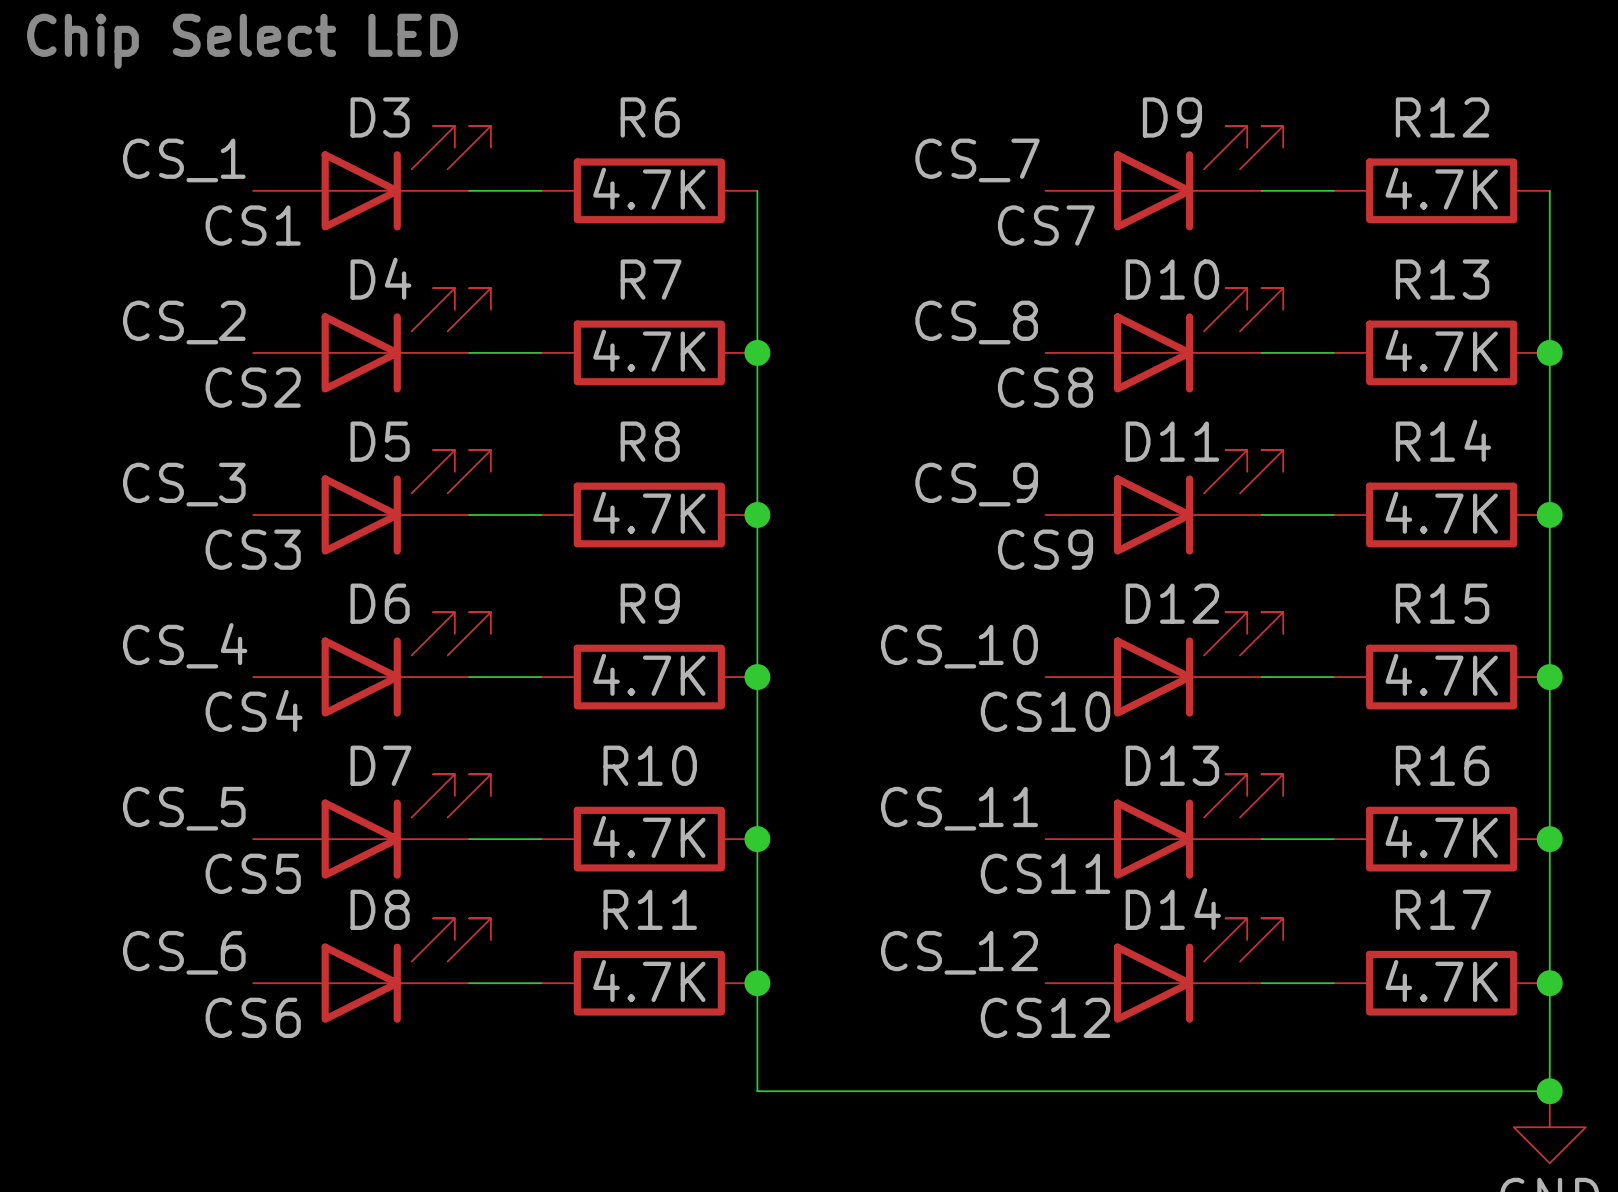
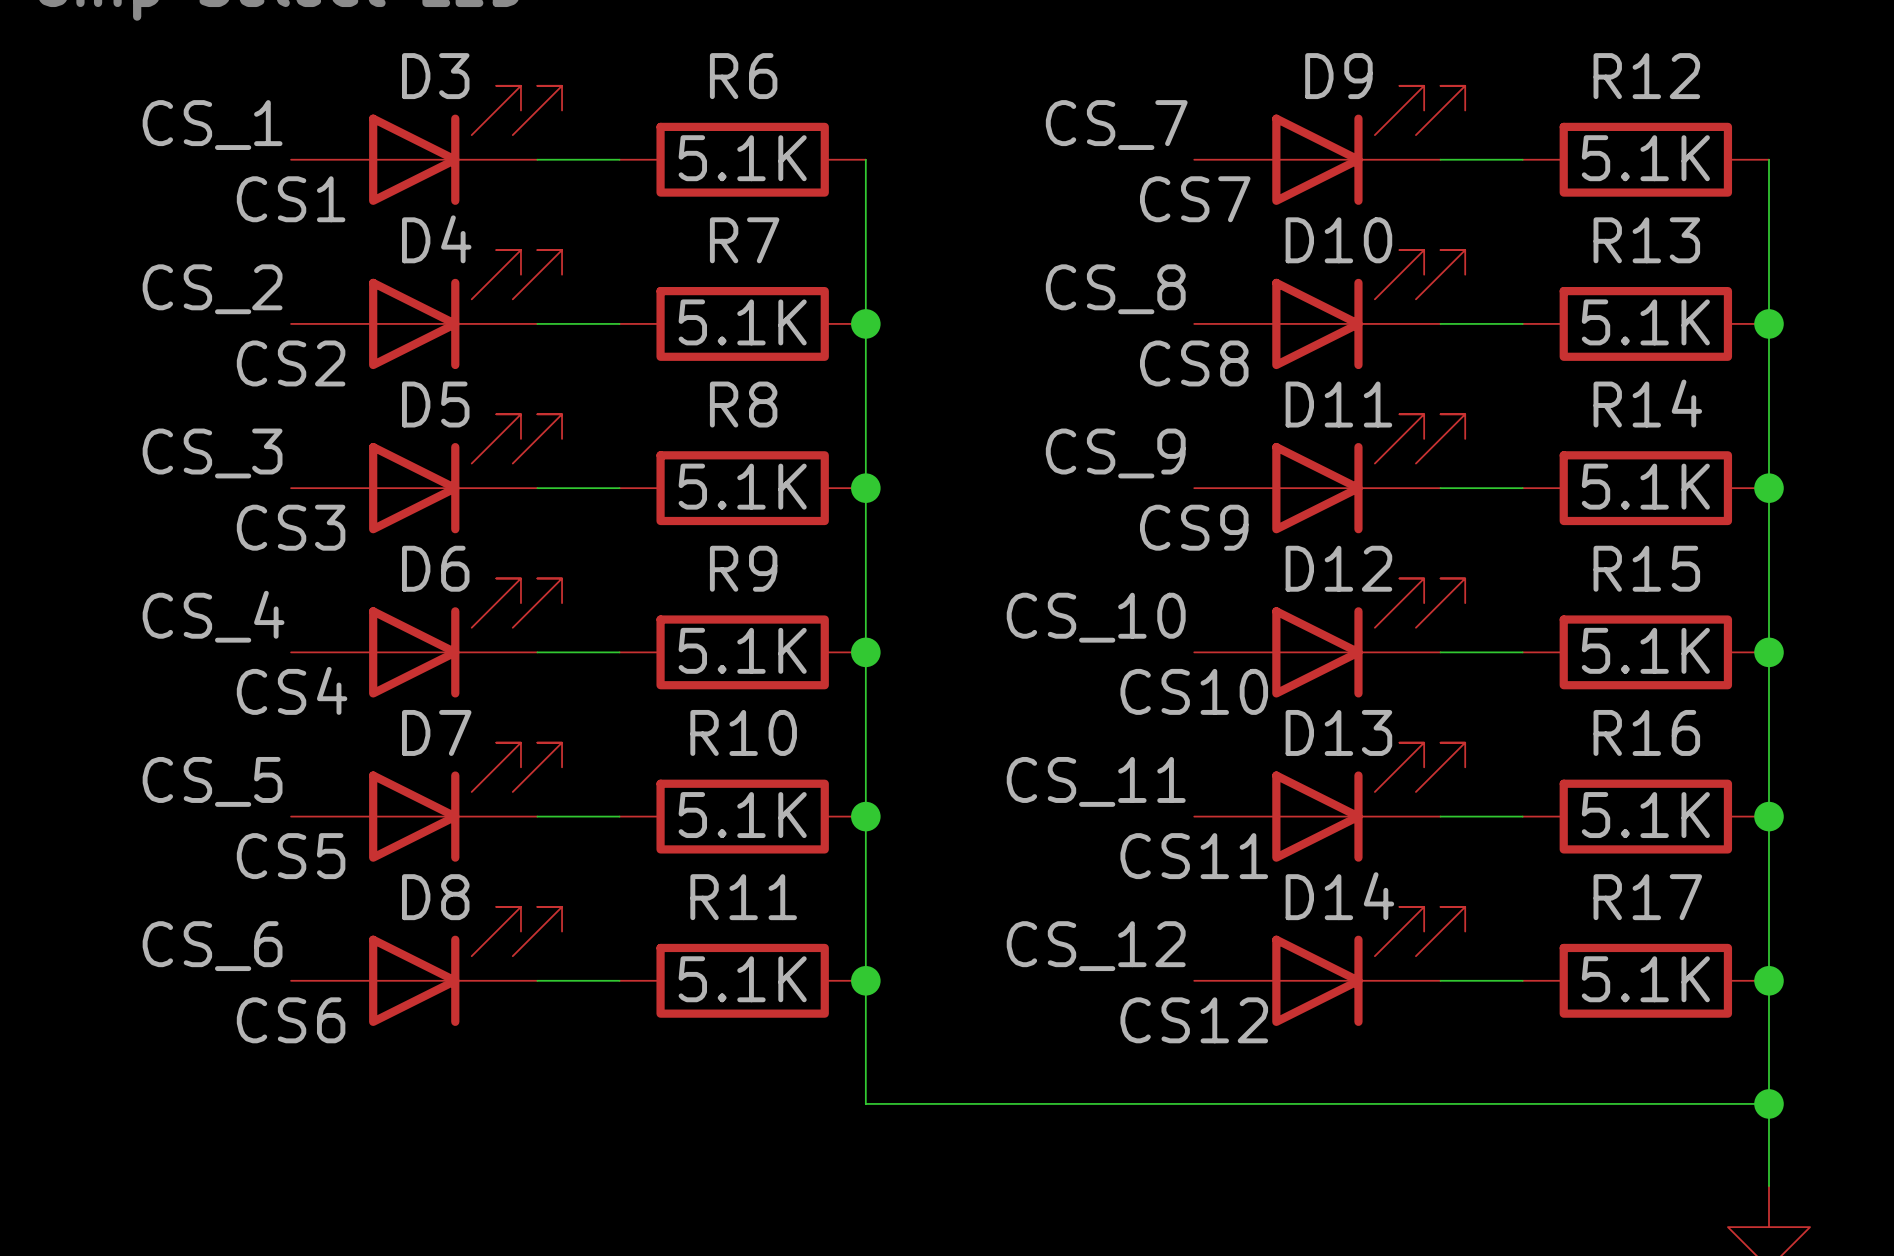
R6 value: 4.7K (649, 188) -> 5.1K (742, 158)
R12 value: 4.7K (1441, 188) -> 5.1K (1645, 158)
label position: CS_2 (184, 322) -> CS_2 (212, 289)
label position: CS_8 (976, 322) -> CS_8 (1115, 289)
D4 position: (372, 340) -> (426, 309)
D10 position: (1164, 340) -> (1329, 309)
R7 value: 4.7K (649, 350) -> 5.1K (742, 322)
R13 value: 4.7K (1441, 350) -> 5.1K (1645, 322)
wire: (469, 352) (541, 352) -> (537, 323) (619, 323)
R7 position: (649, 352) -> (742, 323)
junction position: (757, 352) -> (865, 323)
wire: (1261, 352) (1333, 352) -> (1440, 323) (1522, 323)
R13 position: (1441, 352) -> (1645, 323)
junction position: (1549, 352) -> (1769, 323)
label position: CS_3 (184, 484) -> CS_3 (212, 453)
label position: CS_9 (976, 484) -> CS_9 (1115, 453)
D5 position: (372, 502) -> (426, 473)
D11 position: (1164, 502) -> (1329, 473)
R8 value: 4.7K (649, 512) -> 5.1K (742, 486)
R14 value: 4.7K (1441, 512) -> 5.1K (1645, 486)
wire: (469, 514) (541, 514) -> (537, 488) (619, 488)
R8 position: (649, 514) -> (742, 488)
junction position: (757, 514) -> (865, 488)
wire: (1261, 514) (1333, 514) -> (1440, 488) (1522, 488)
R14 position: (1441, 514) -> (1645, 488)
junction position: (1549, 514) -> (1769, 488)
junction: none -> (865, 652)
junction: none -> (1769, 652)
label position: CS_4 (185, 645) -> CS_4 (213, 616)
label position: CS_10 (959, 646) -> CS_10 (1096, 617)
D6 position: (372, 664) -> (426, 638)
D12 position: (1164, 664) -> (1329, 638)
R9 value: 4.7K (649, 674) -> 5.1K (742, 650)
R15 value: 4.7K (1441, 674) -> 5.1K (1645, 650)
wire: (469, 677) (541, 677) -> (537, 652) (619, 652)
R9 position: (649, 677) -> (742, 652)
junction: (757, 677) -> none
wire: (1261, 677) (1333, 677) -> (1440, 652) (1522, 652)
R15 position: (1441, 677) -> (1645, 652)
junction: (1549, 677) -> none
junction: none -> (865, 816)
junction: none -> (1769, 816)
label position: CS_5 (184, 808) -> CS_5 (212, 781)
label position: CS_11 (959, 808) -> CS_11 (1096, 781)
D7 position: (372, 826) -> (426, 802)
D13 position: (1164, 826) -> (1329, 802)
R10 value: 4.7K (649, 836) -> 5.1K (742, 815)
R16 value: 4.7K (1441, 836) -> 5.1K (1645, 815)
wire: (469, 839) (541, 839) -> (537, 816) (619, 816)
R10 position: (649, 839) -> (742, 816)
junction: (757, 839) -> none
wire: (1261, 839) (1333, 839) -> (1440, 816) (1522, 816)
R16 position: (1441, 839) -> (1645, 816)
junction: (1549, 839) -> none
junction: none -> (865, 980)
junction: none -> (1769, 980)
label position: CS_6 (184, 952) -> CS_6 (212, 946)
label position: CS_12 (959, 952) -> CS_12 (1096, 946)
D8 position: (372, 970) -> (426, 966)
D14 position: (1164, 970) -> (1329, 966)
R11 value: 4.7K (649, 980) -> 5.1K (742, 979)
R17 value: 4.7K (1441, 980) -> 5.1K (1645, 979)
wire: (469, 983) (541, 983) -> (537, 980) (619, 980)
R11 position: (649, 983) -> (742, 980)
junction: (757, 983) -> none
wire: (1261, 983) (1333, 983) -> (1440, 980) (1522, 980)
R17 position: (1441, 983) -> (1645, 980)
junction: (1549, 983) -> none
wire: (757, 1019) (757, 1091) (1549, 1091) -> (865, 1103) (1769, 1103)
junction: none -> (1769, 1103)
junction: (1549, 1091) -> none

